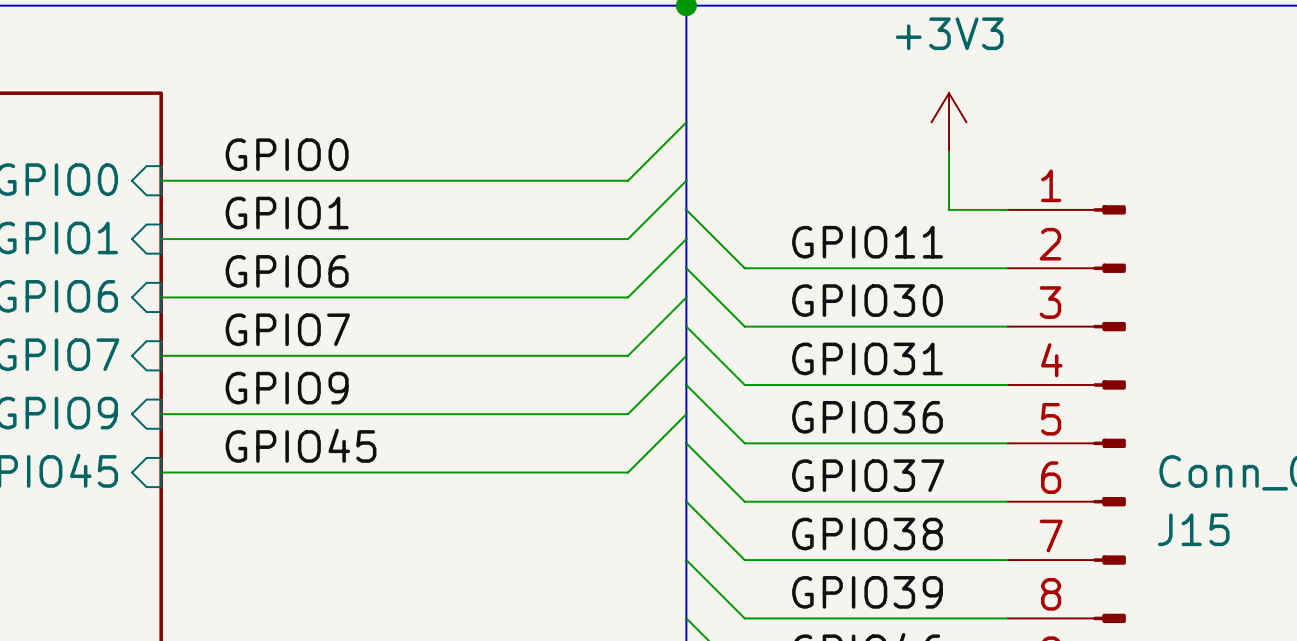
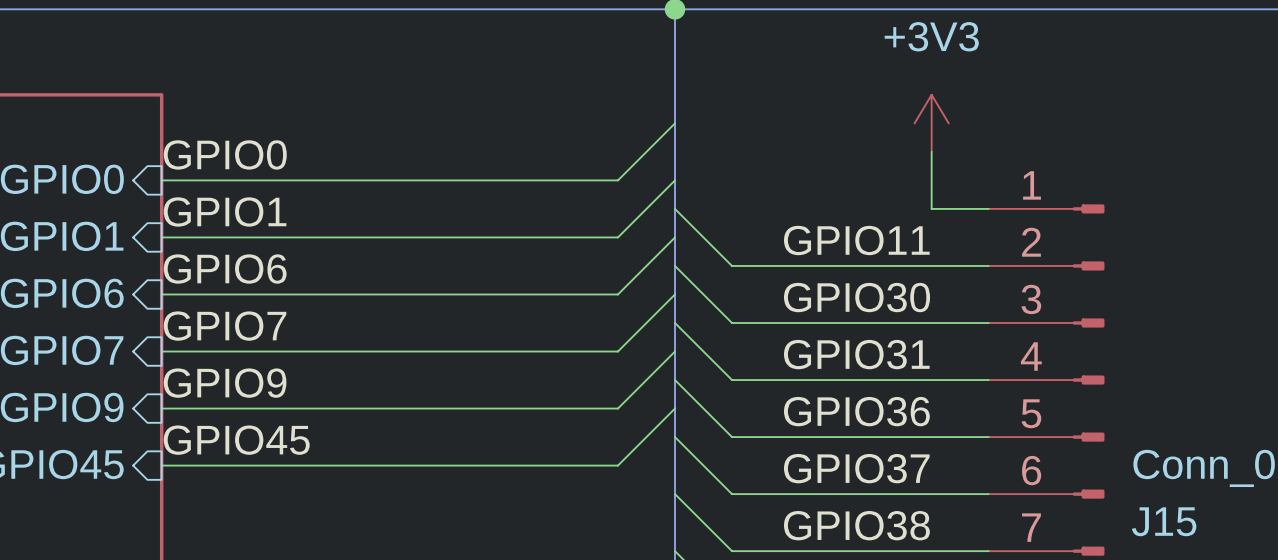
label position: GPIO0 (287, 154) -> GPIO0 (225, 154)
label position: GPIO1 (287, 213) -> GPIO1 (225, 211)
label position: GPIO6 (287, 271) -> GPIO6 (225, 269)
label position: GPIO7 (287, 329) -> GPIO7 (225, 326)
label position: GPIO9 (287, 388) -> GPIO9 (225, 383)
label position: GPIO45 (301, 445) -> GPIO45 (236, 440)

